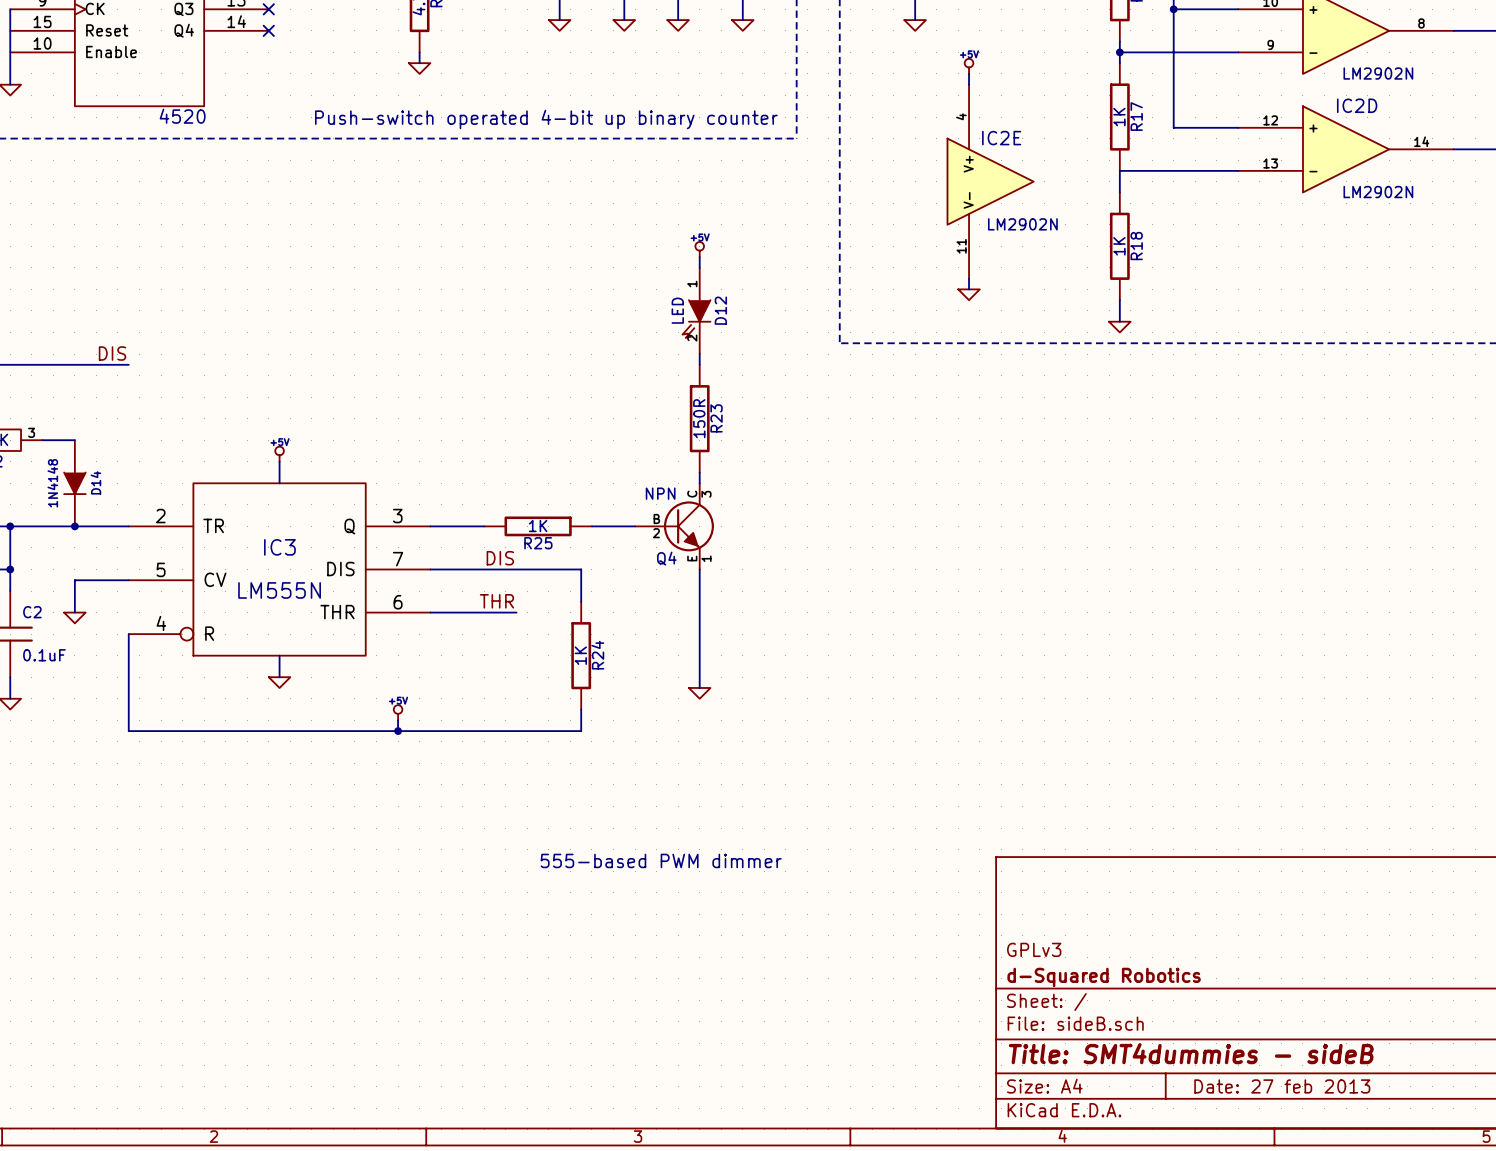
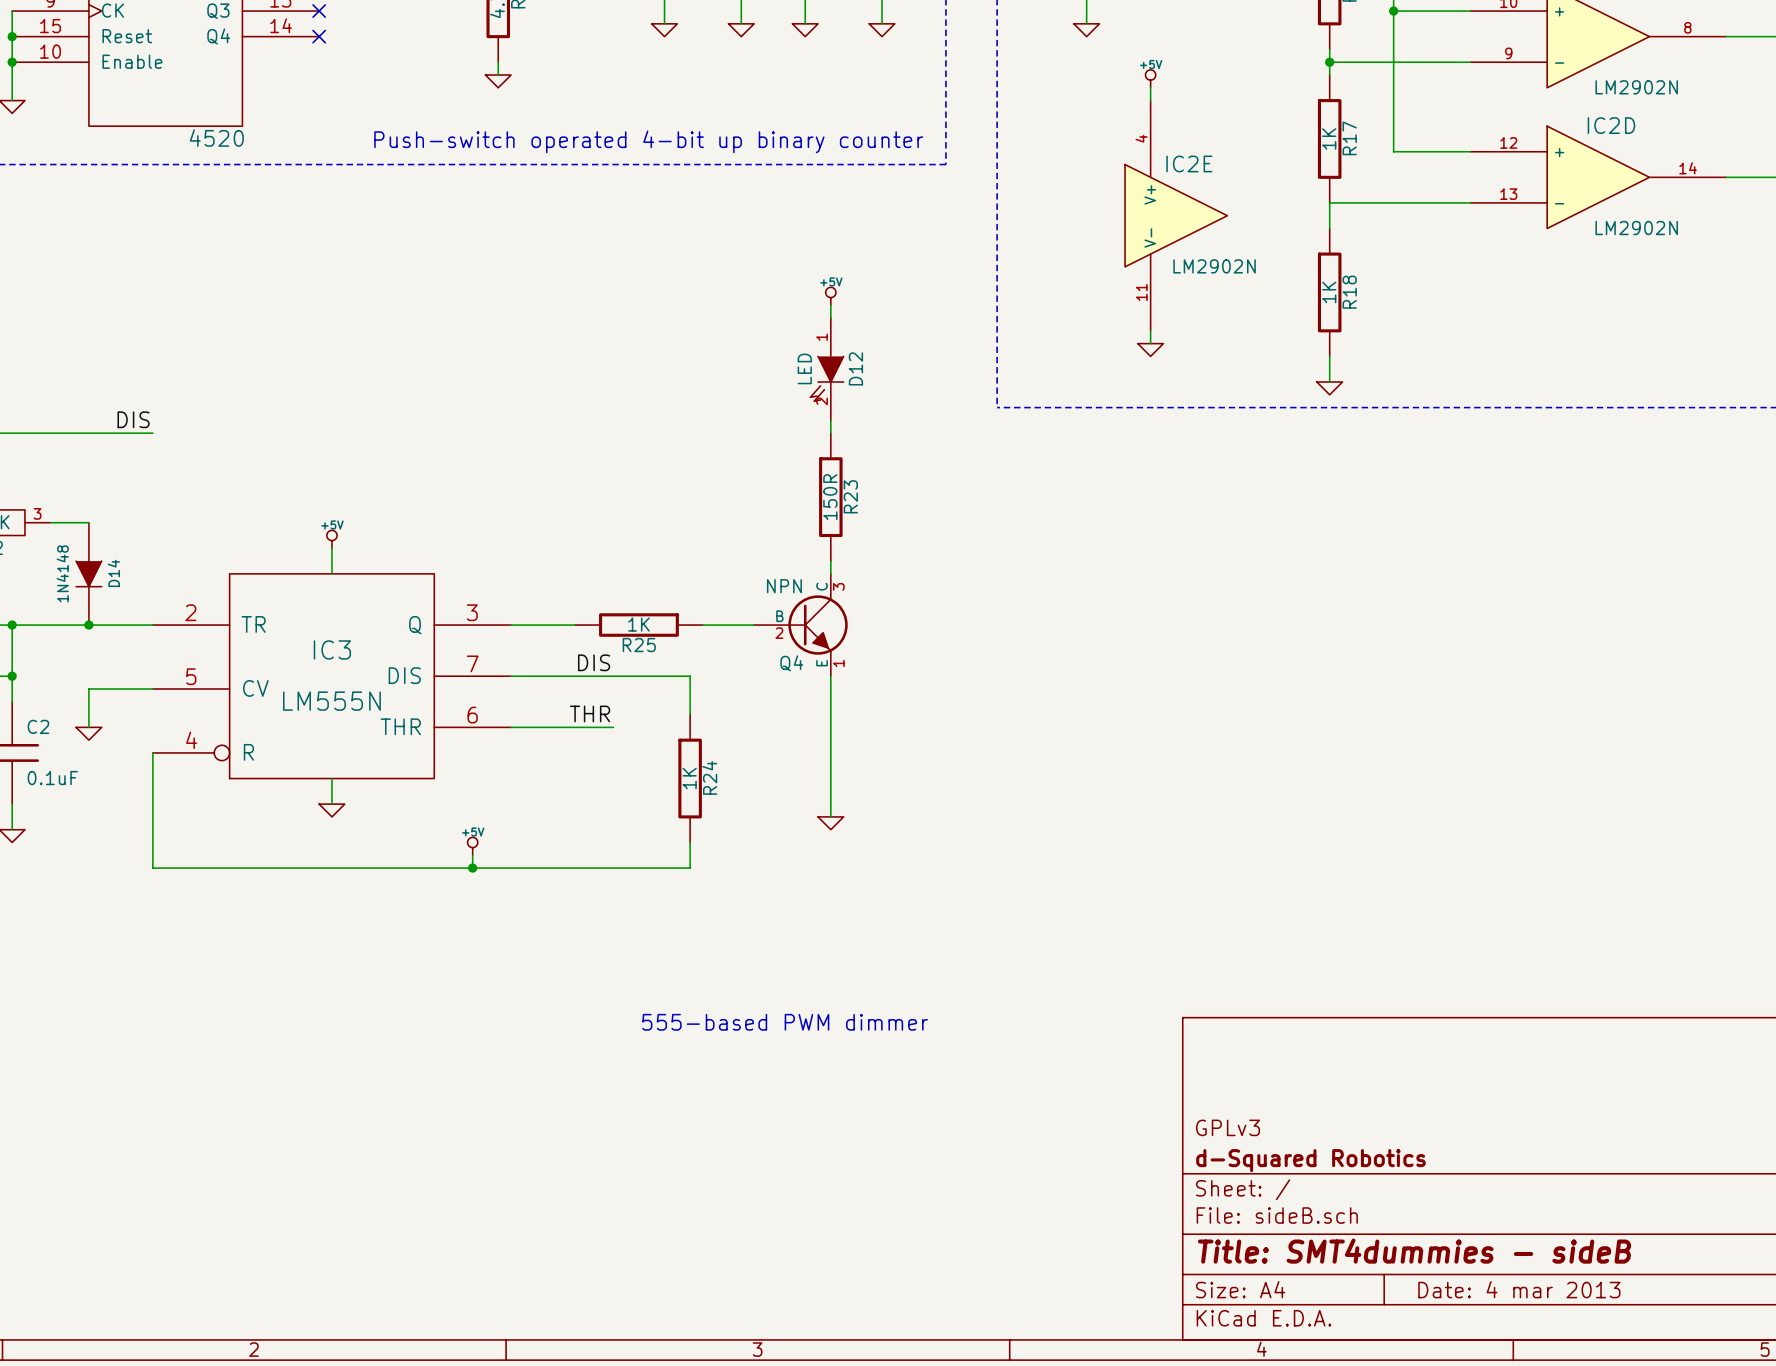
junction: none -> (12, 36)
junction: none -> (12, 62)
title block: Date: 27 feb 2013 (1282, 1086) -> Date: 4 mar 2013 (1519, 1289)

